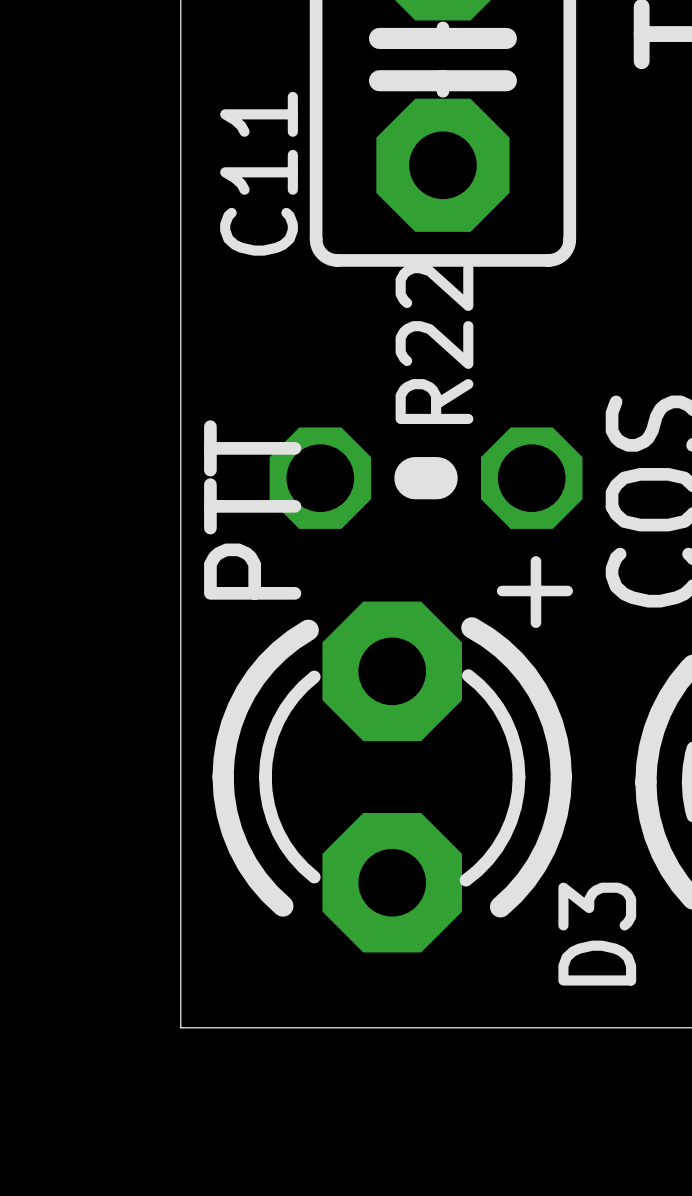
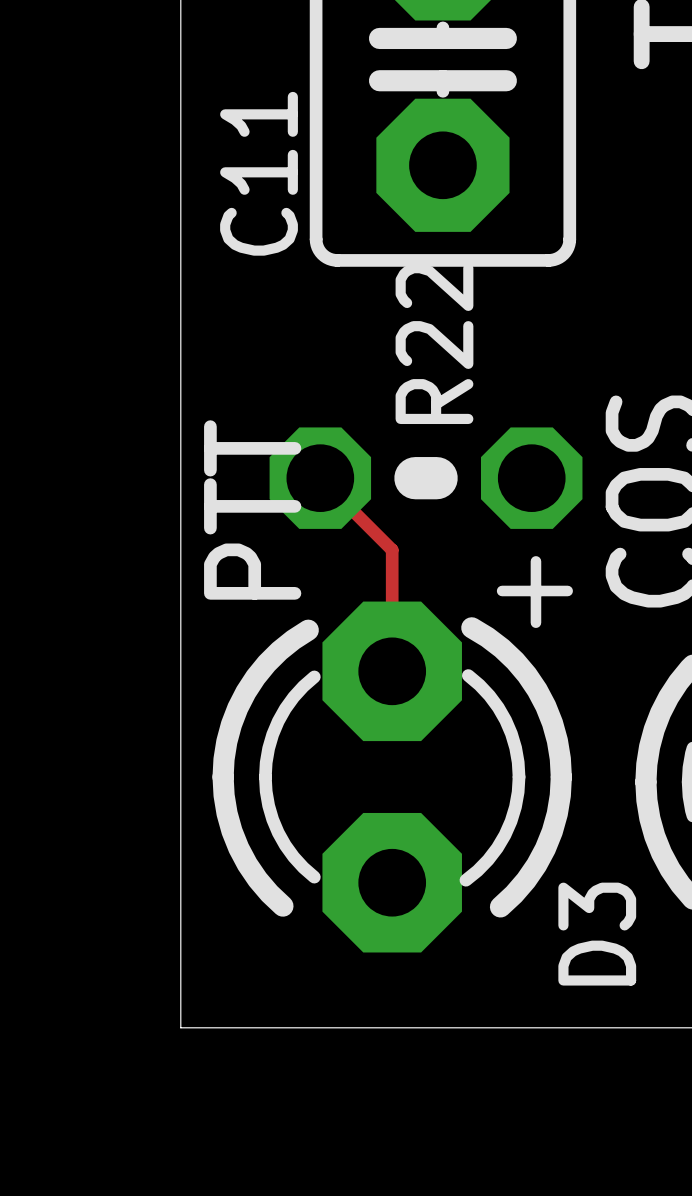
track: none -> (320, 478) (392, 550) (392, 671)

